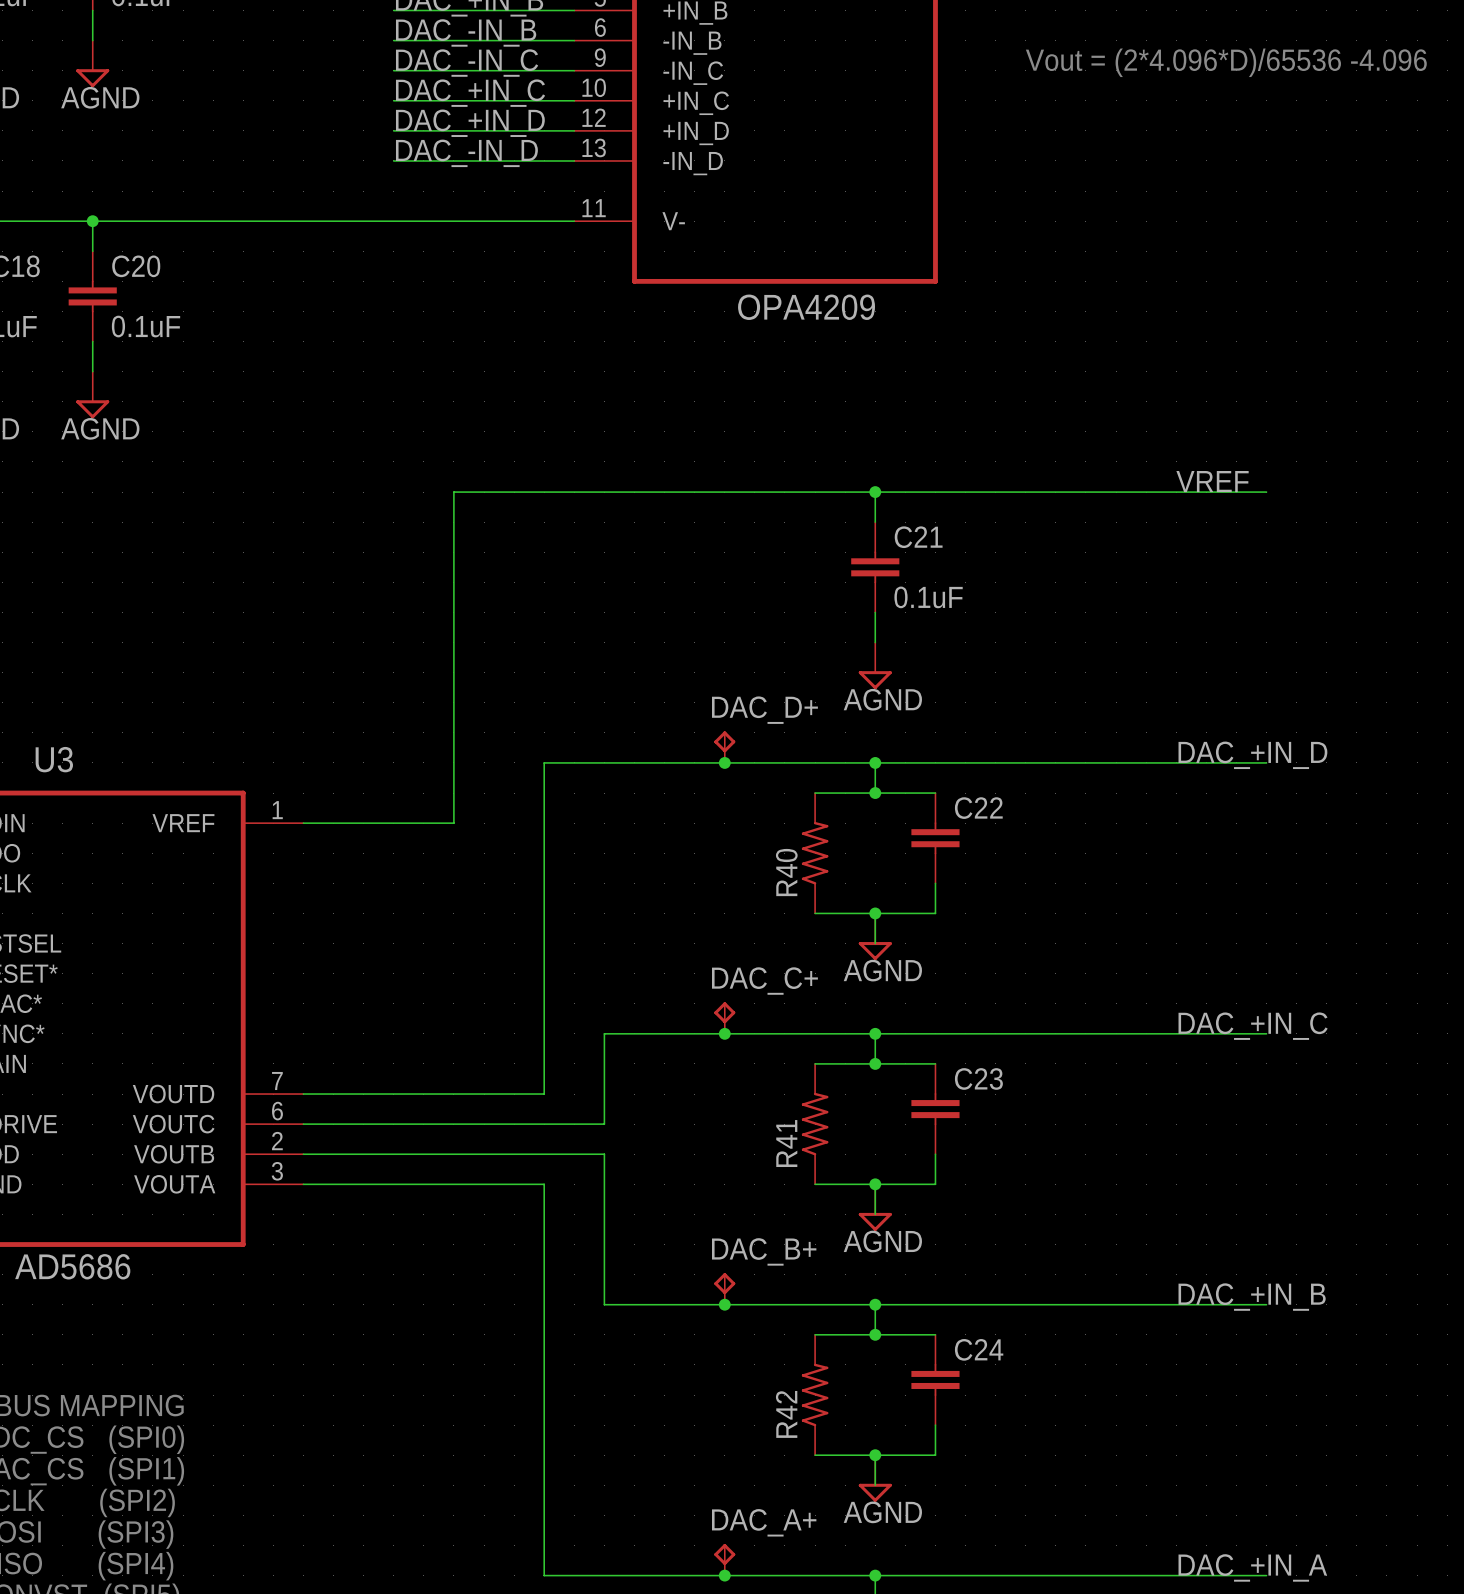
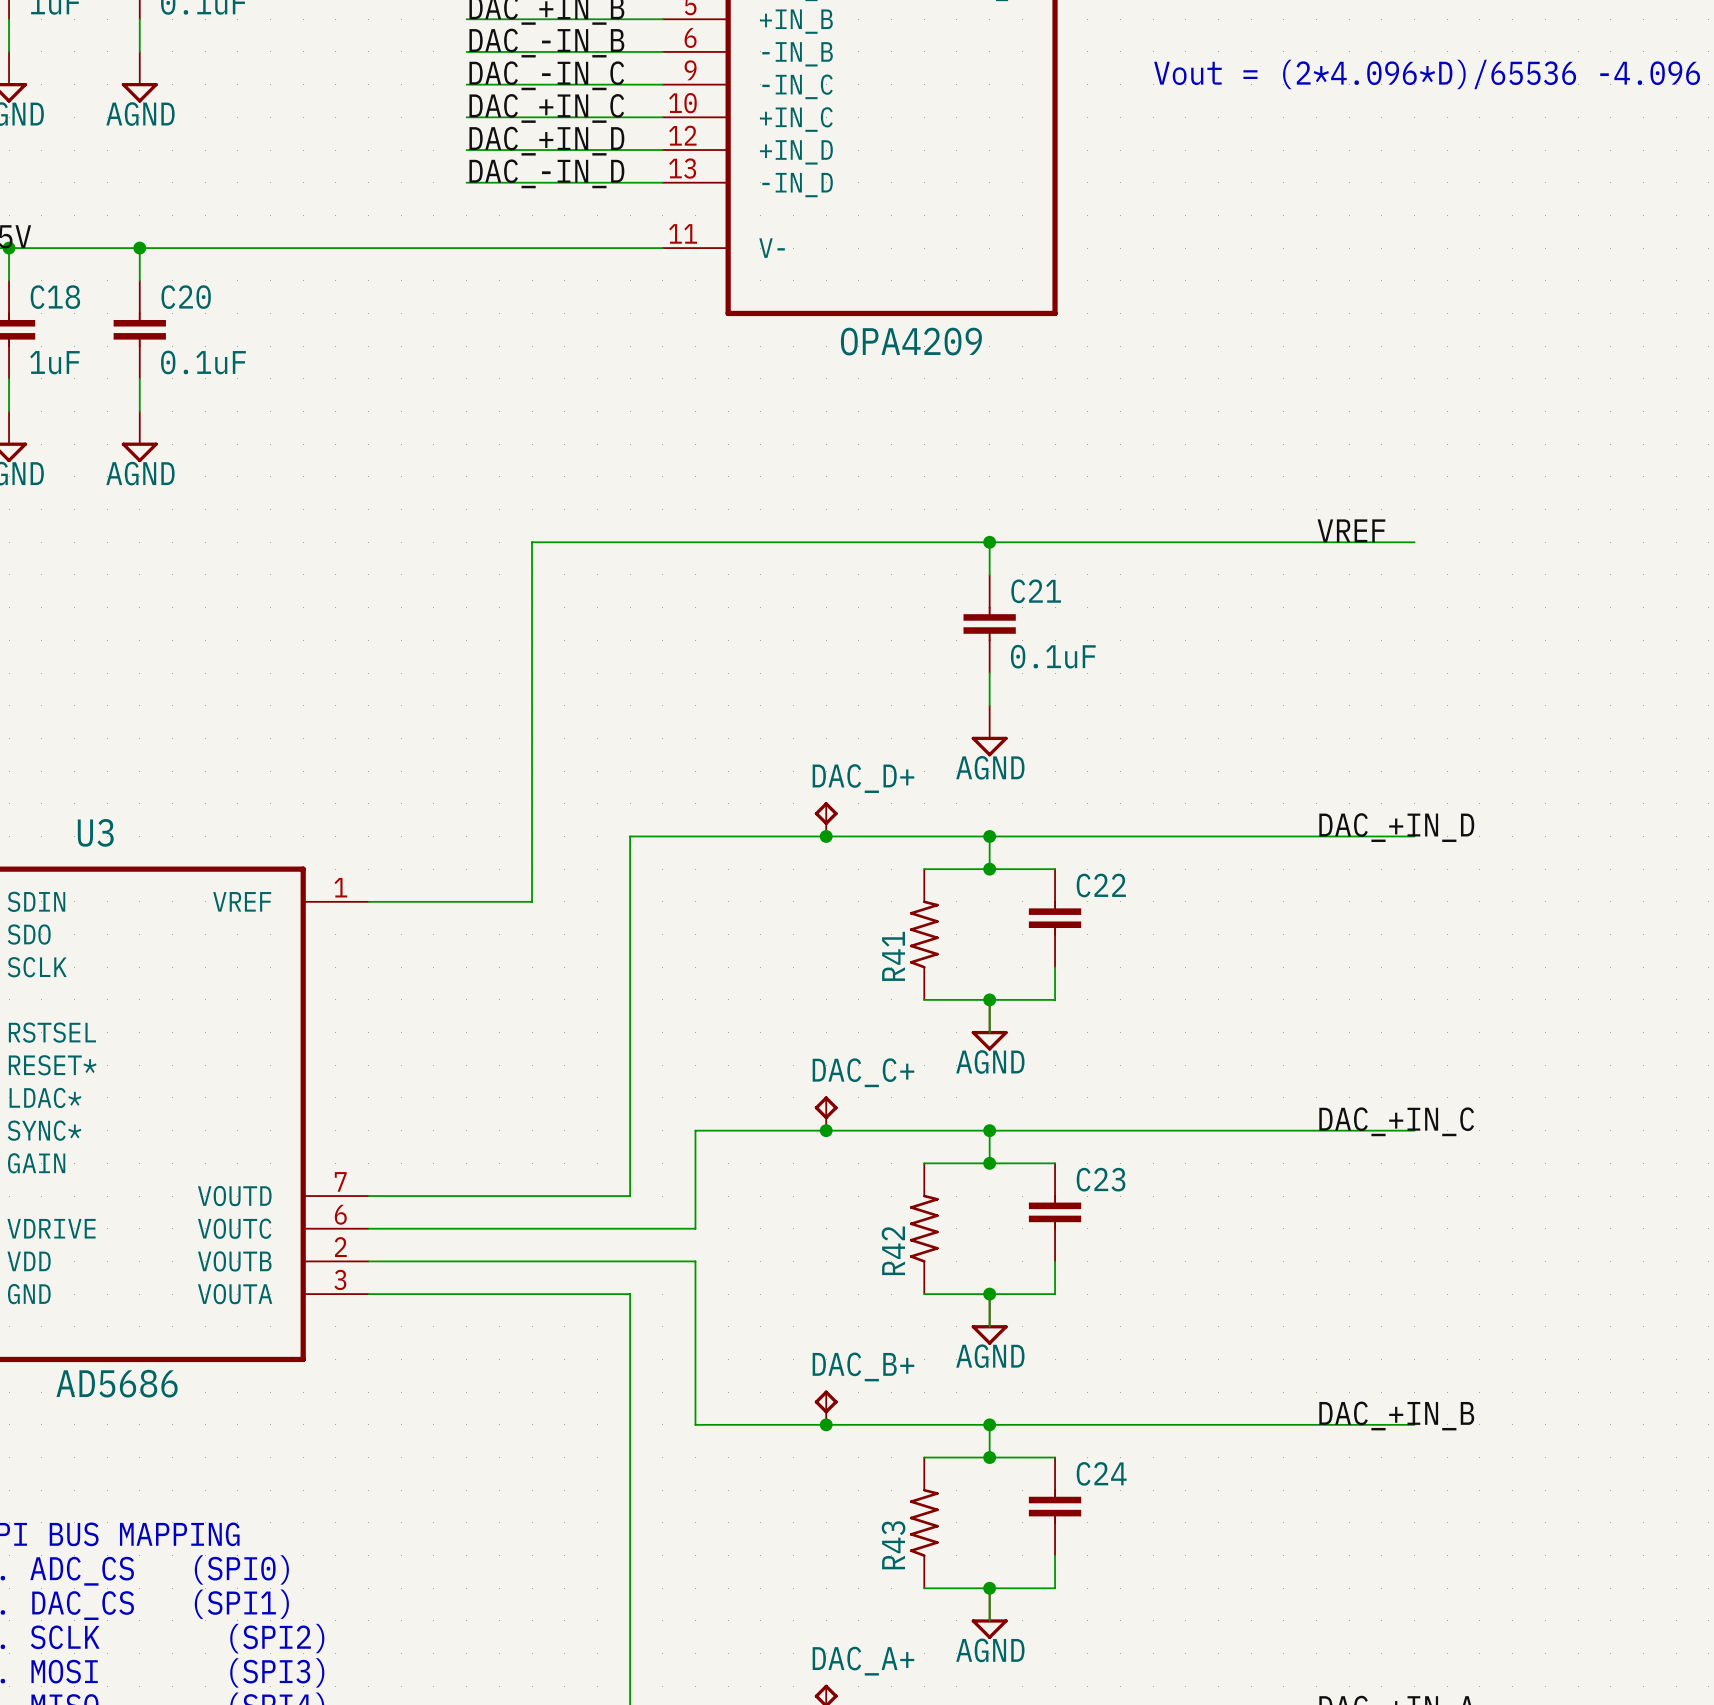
R40 name: R40 (786, 872) -> R41 (893, 956)
R41 name: R41 (786, 1143) -> R42 (893, 1250)
R42 name: R42 (786, 1414) -> R43 (893, 1545)

